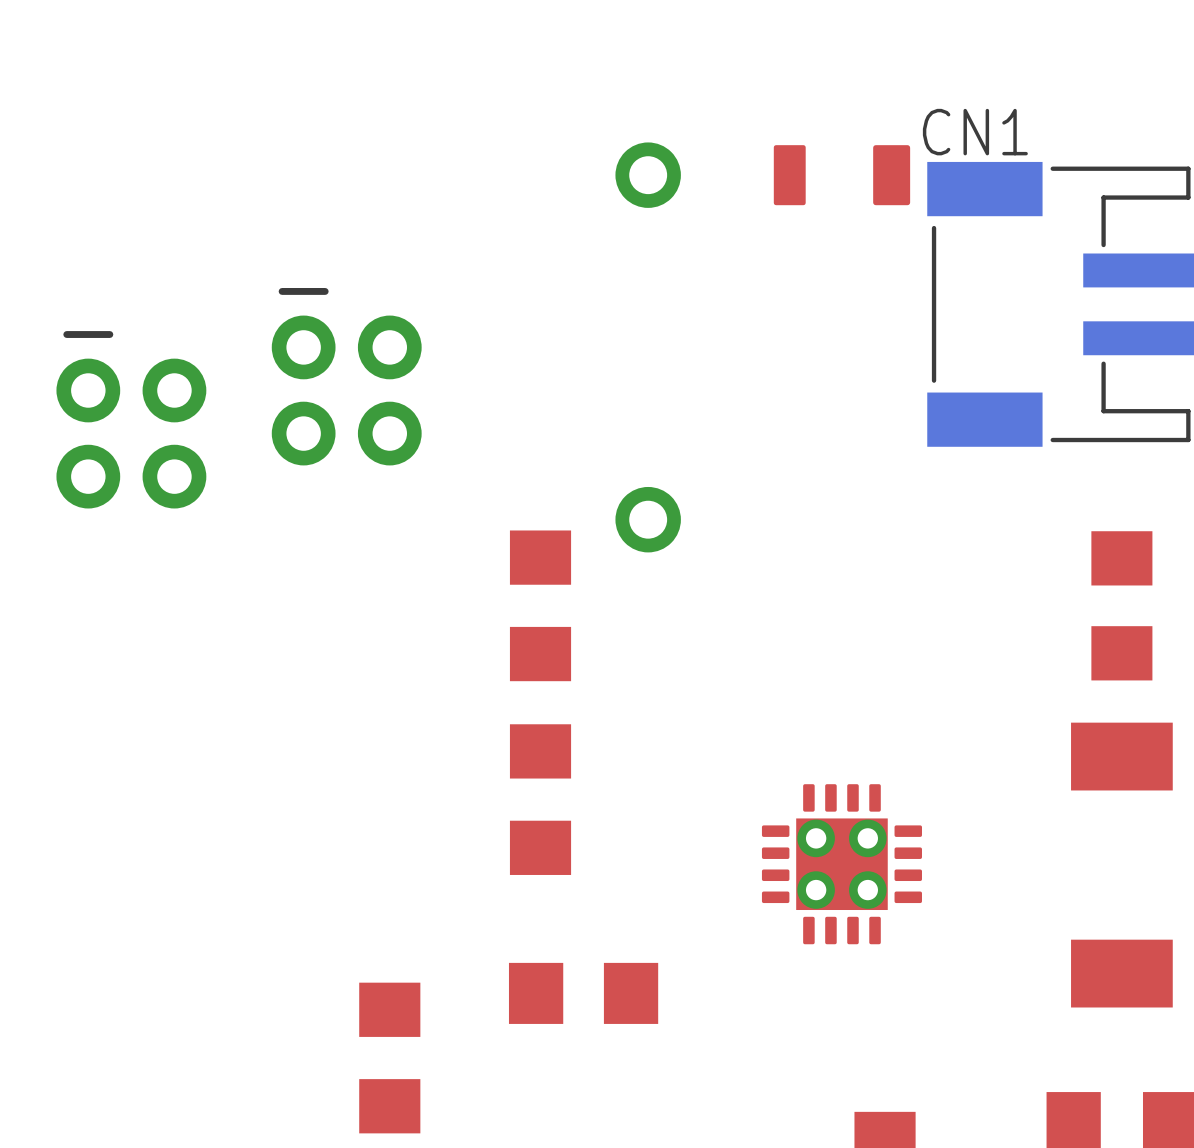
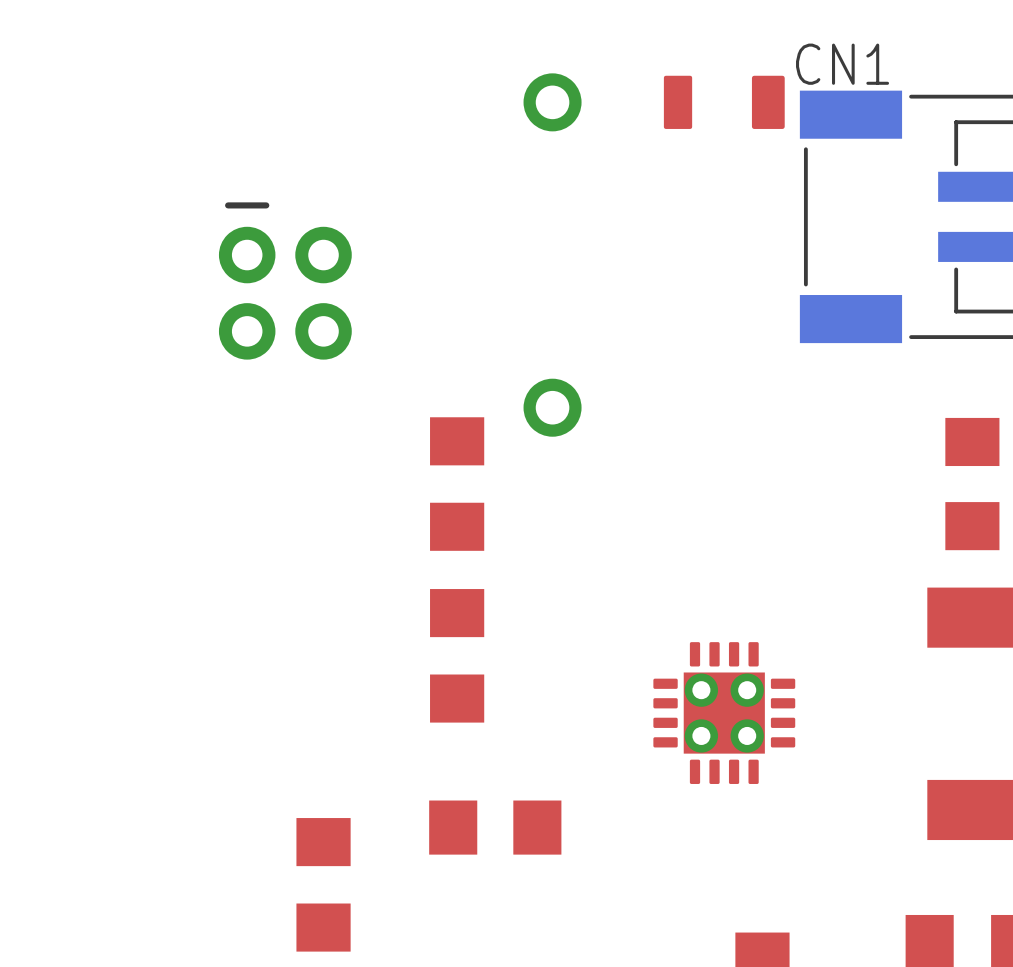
part: (131, 419) -> none

